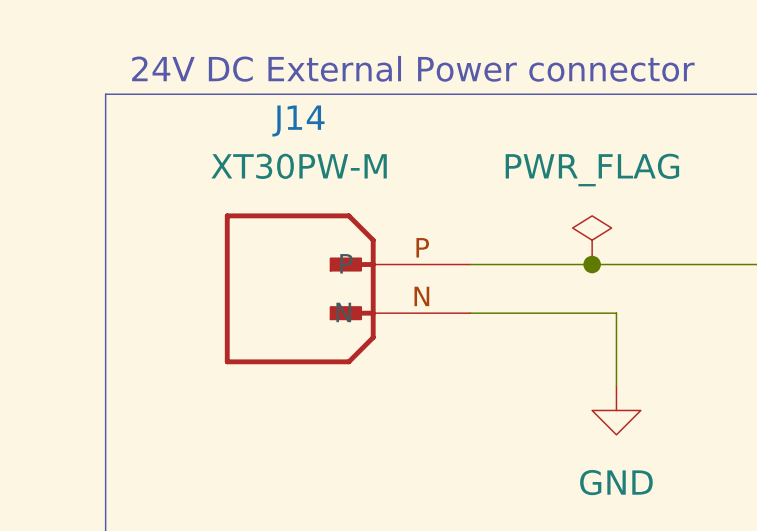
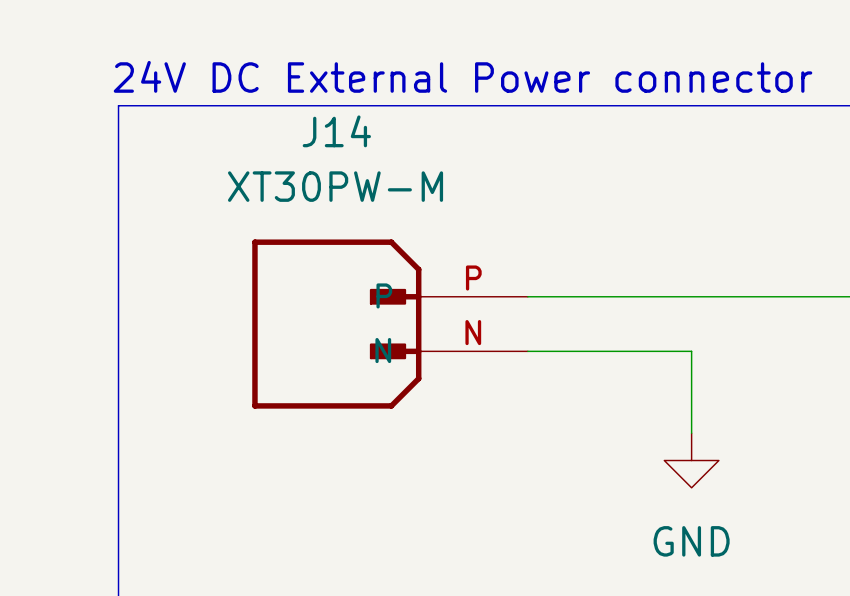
power symbol: PWR_FLAG (592, 240) -> none
junction: (592, 264) -> none

